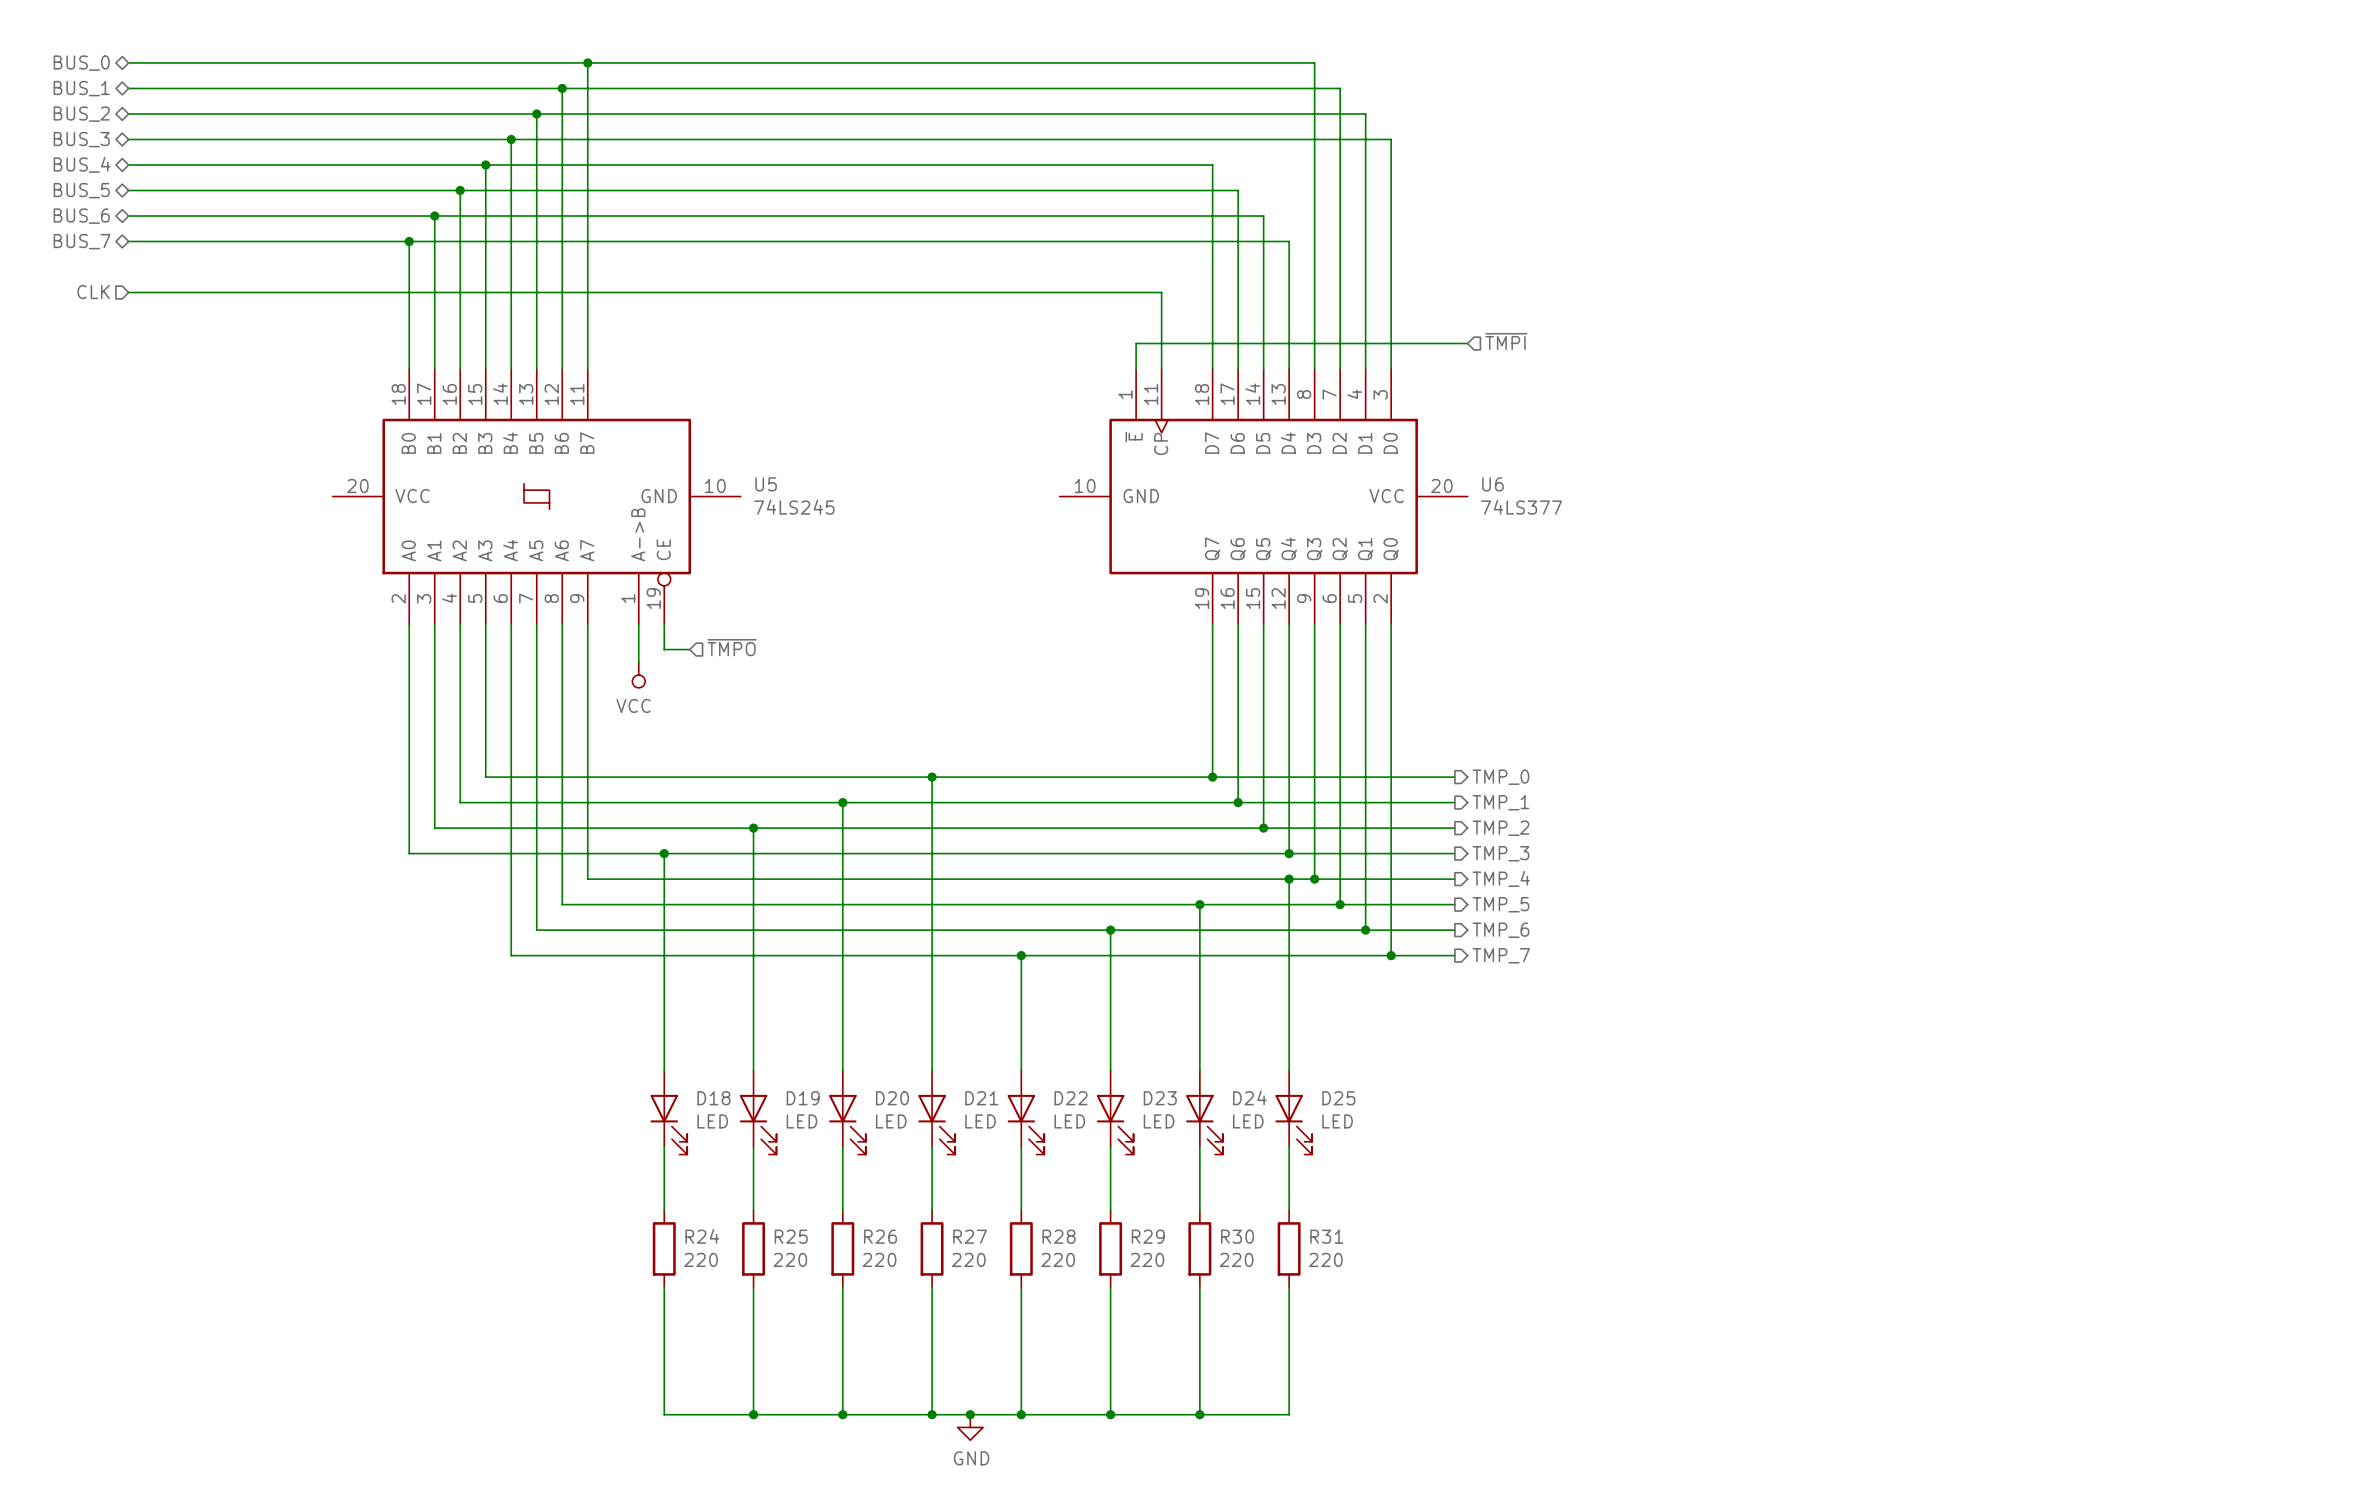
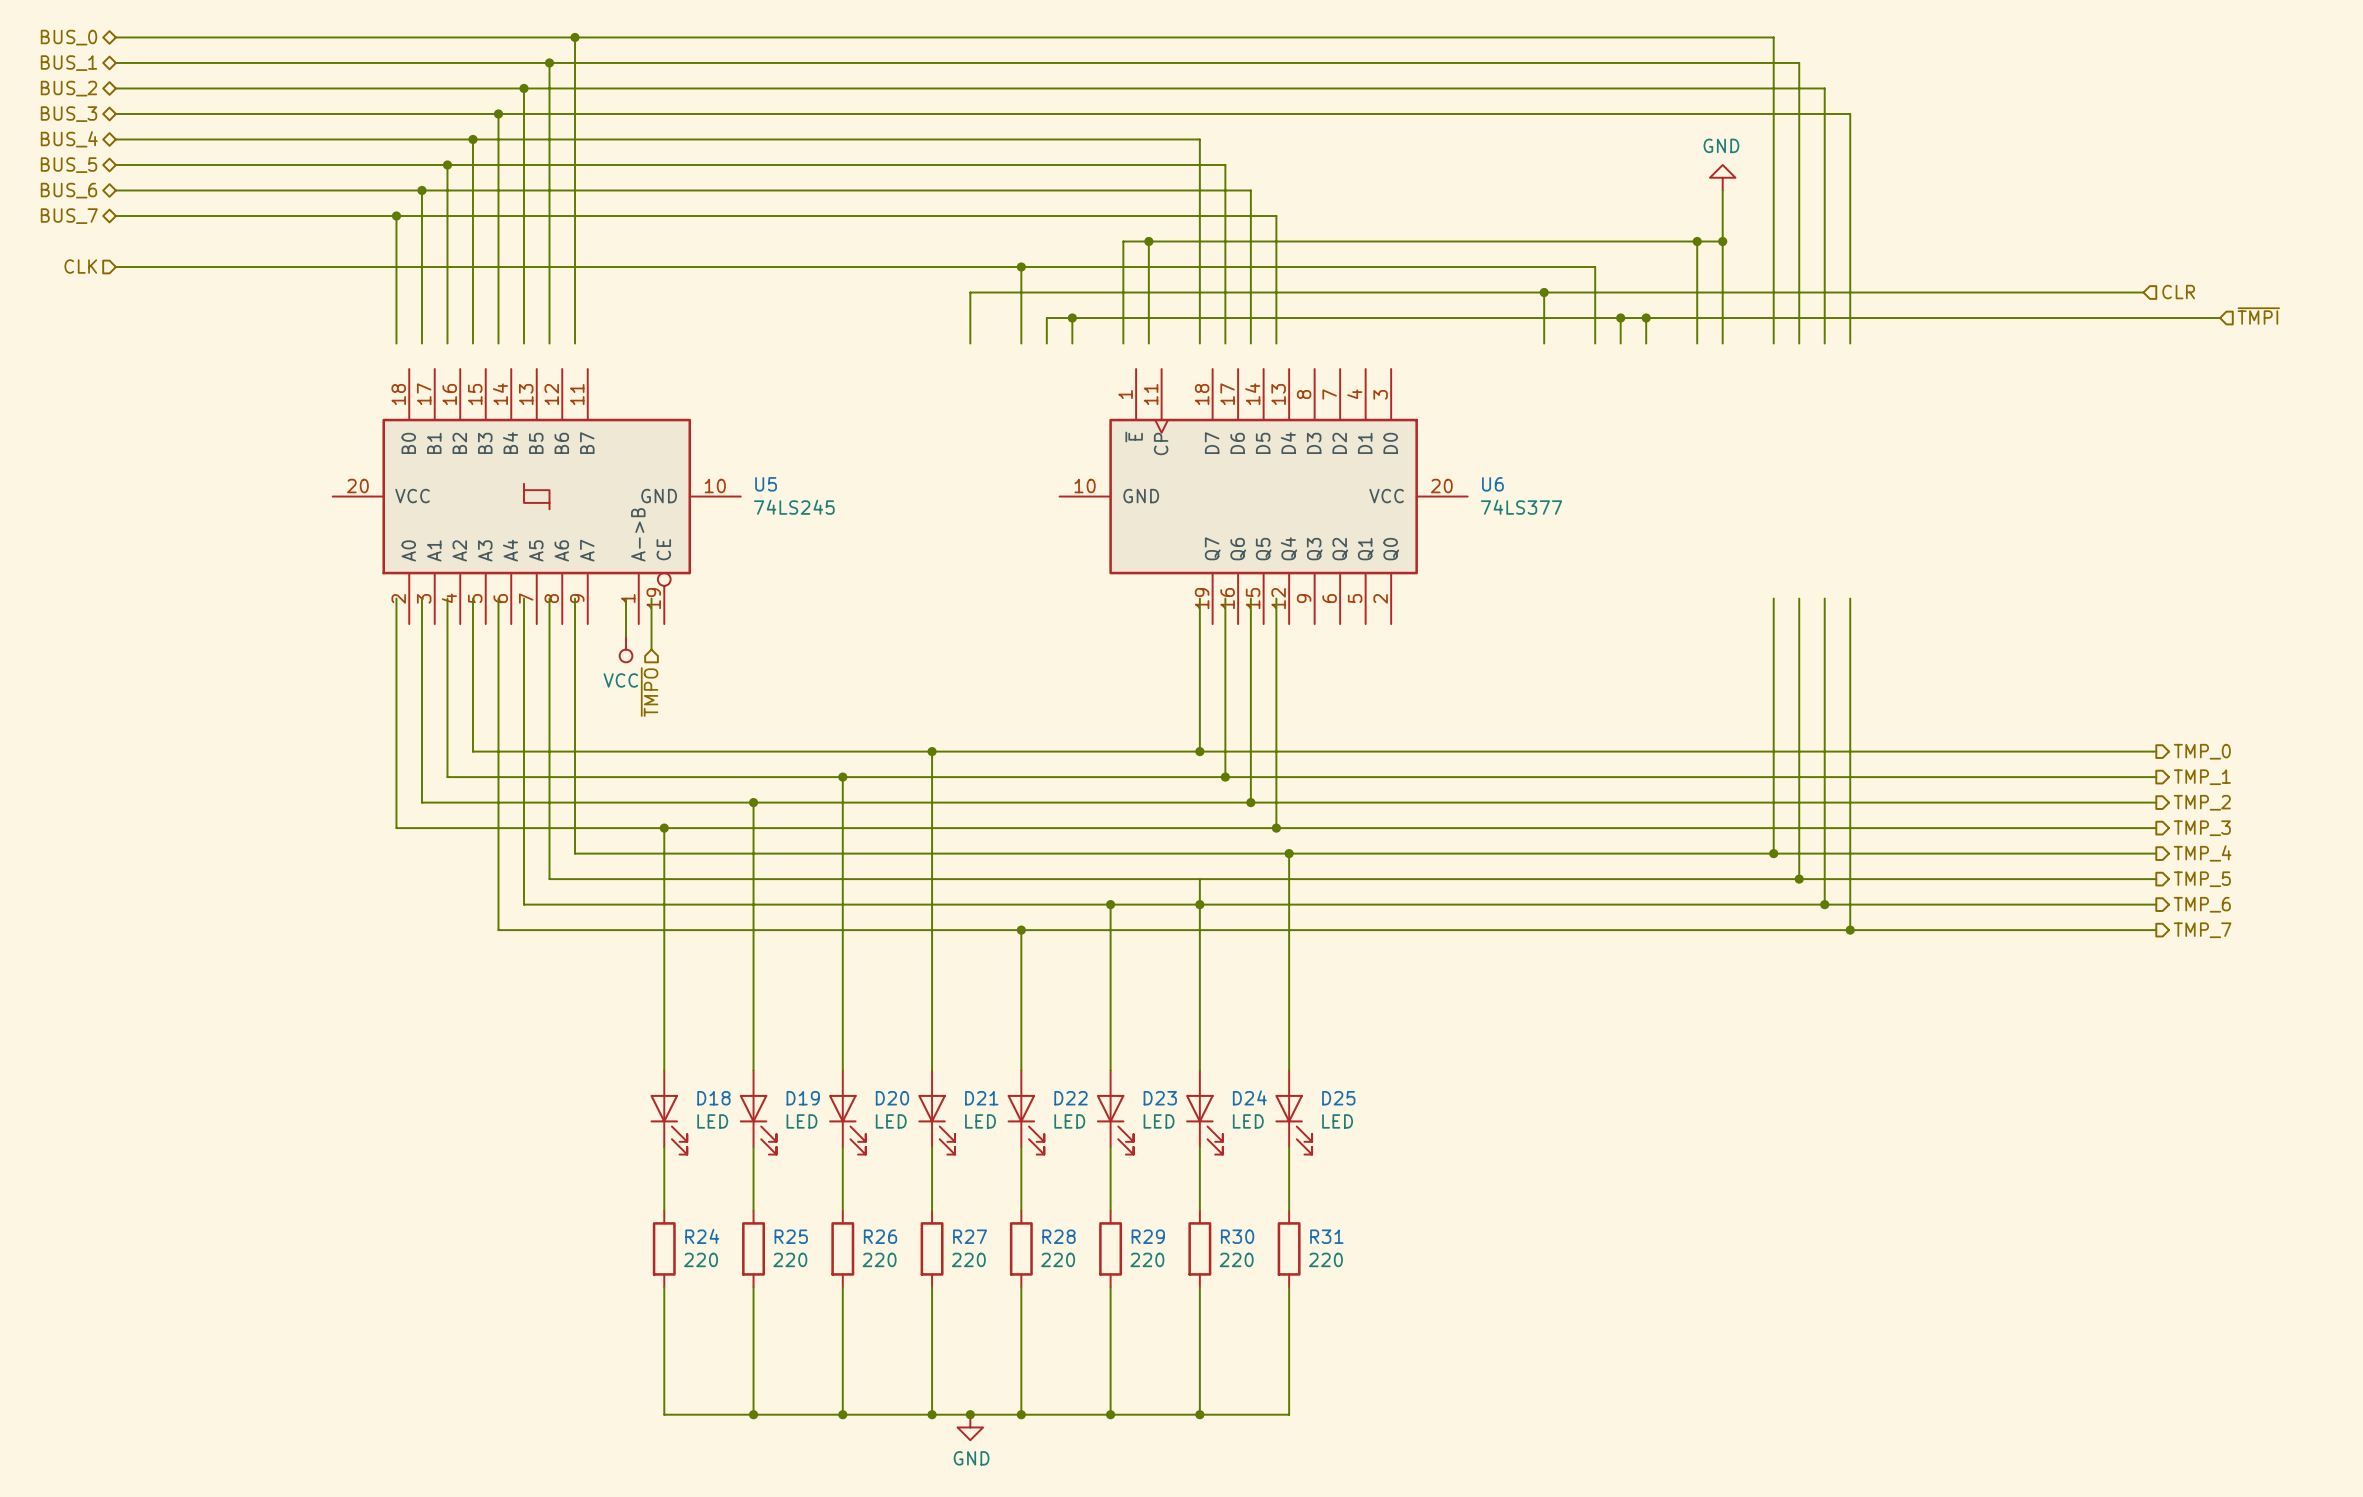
wire: none -> (115, 37) (1773, 37) (1773, 343)
junction: none -> (575, 37)
wire: none -> (115, 62) (128, 62)
junction: none -> (549, 62)
wire: (587, 62) (587, 369) -> (575, 37) (575, 343)
junction: (587, 62) -> none
wire: (1314, 62) (1314, 369) -> (1314, 62) (1799, 62) (1799, 343)
hierarchical label position: BUS_0 (81, 63) -> BUS_0 (68, 37)
hierarchical label position: BUS_1 (81, 88) -> BUS_1 (68, 63)
wire: none -> (115, 88) (128, 88)
junction: none -> (524, 88)
wire: (562, 88) (562, 369) -> (549, 62) (549, 343)
junction: (562, 88) -> none
wire: (1340, 88) (1340, 369) -> (1340, 88) (1824, 88) (1824, 343)
wire: none -> (115, 113) (128, 113)
junction: none -> (498, 113)
wire: (536, 113) (536, 369) -> (524, 88) (524, 343)
junction: (536, 113) -> none
wire: (1365, 113) (1365, 369) -> (1365, 113) (1850, 113) (1850, 343)
hierarchical label position: BUS_2 (81, 114) -> BUS_2 (68, 88)
hierarchical label position: BUS_3 (81, 139) -> BUS_3 (68, 114)
wire: none -> (115, 139) (128, 139)
junction: none -> (472, 139)
wire: (511, 139) (511, 369) -> (498, 113) (498, 343)
junction: (511, 139) -> none
wire: (1199, 139) (1391, 139) (1391, 369) -> (1199, 139) (1199, 343)
hierarchical label position: BUS_4 (82, 164) -> BUS_4 (69, 139)
wire: none -> (115, 164) (128, 164)
junction: none -> (447, 164)
wire: (485, 164) (485, 369) -> (472, 139) (472, 343)
junction: (485, 164) -> none
wire: (1212, 164) (1212, 369) -> (1212, 164) (1225, 164) (1225, 343)
power symbol: none -> GND (1722, 177)
hierarchical label position: BUS_5 (81, 190) -> BUS_5 (68, 165)
wire: none -> (115, 190) (128, 190)
junction: none -> (421, 190)
wire: (460, 190) (460, 369) -> (447, 164) (447, 343)
junction: (460, 190) -> none
wire: (1238, 190) (1238, 369) -> (1238, 190) (1250, 190) (1250, 343)
wire: none -> (1722, 190) (1722, 343)
wire: none -> (115, 215) (128, 215)
junction: none -> (396, 215)
wire: (434, 215) (434, 369) -> (421, 190) (421, 343)
junction: (434, 215) -> none
wire: (1263, 215) (1263, 369) -> (1263, 215) (1276, 215) (1276, 343)
hierarchical label position: BUS_6 (81, 216) -> BUS_6 (68, 190)
hierarchical label position: BUS_7 (82, 241) -> BUS_7 (69, 216)
wire: (128, 241) (1123, 241) -> (1123, 343) (1123, 241)
wire: (409, 241) (409, 369) -> (396, 215) (396, 343)
junction: (409, 241) -> none
wire: none -> (1148, 241) (1148, 343)
junction: none -> (1148, 241)
wire: (1289, 241) (1289, 369) -> (1289, 241) (1722, 241)
wire: none -> (1697, 241) (1697, 343)
junction: none -> (1697, 241)
junction: none -> (1722, 241)
wire: none -> (115, 267) (1595, 267) (1595, 343)
wire: none -> (1021, 267) (1021, 343)
junction: none -> (1021, 267)
hierarchical label position: CLK (93, 292) -> CLK (80, 266)
wire: (128, 292) (970, 292) -> (970, 343) (970, 292)
wire: (1161, 292) (1161, 369) -> (1161, 292) (2143, 292)
wire: none -> (1544, 292) (1544, 343)
junction: none -> (1544, 292)
hierarchical label: none -> CLR (2178, 292)
hierarchical label: none -> ~{TMPI} (2258, 316)
wire: none -> (1072, 318) (1072, 343)
junction: none -> (1072, 318)
wire: none -> (1620, 318) (1620, 343)
junction: none -> (1620, 318)
wire: none -> (1646, 318) (1646, 343)
junction: none -> (1646, 318)
wire: none -> (2220, 318) (1046, 318) (1046, 343)
hierarchical label: ~{TMPI} (1506, 341) -> none
wire: (1467, 343) (1136, 343) (1136, 369) -> none
wire: none -> (472, 598) (472, 751) (2156, 751)
wire: none -> (651, 598) (651, 649)
wire: none -> (1276, 598) (1276, 828)
wire: none -> (1773, 598) (1773, 853)
wire: none -> (1799, 598) (1799, 879)
wire: none -> (1824, 598) (1824, 904)
wire: none -> (1850, 598) (1850, 930)
wire: (409, 624) (409, 853) (575, 853) -> (575, 598) (575, 853)
wire: (434, 624) (434, 828) -> (396, 598) (396, 828) (434, 828)
wire: (460, 624) (460, 802) -> (421, 598) (421, 802) (460, 802)
wire: (485, 624) (485, 777) -> (447, 598) (447, 777) (485, 777)
wire: (511, 624) (511, 955) (1454, 955) -> none
wire: (536, 624) (536, 930) -> (498, 598) (498, 930) (536, 930)
wire: (562, 624) (562, 904) -> (524, 598) (524, 904) (562, 904)
wire: (587, 624) (587, 879) -> (549, 598) (549, 879) (587, 879)
wire: (638, 624) (638, 662) -> (626, 598) (626, 636)
wire: (664, 624) (664, 649) (689, 649) -> none
wire: (1212, 624) (1212, 777) -> (1199, 598) (1199, 751)
wire: (1238, 624) (1238, 802) -> (1225, 598) (1225, 777)
wire: (1263, 624) (1263, 828) -> (1250, 598) (1250, 802)
wire: (1289, 624) (1289, 853) -> (1289, 879) (1289, 853)
wire: (1314, 624) (1314, 879) -> none
wire: (1340, 624) (1340, 904) -> none
wire: (1365, 624) (1365, 930) -> none
wire: (1391, 624) (1391, 955) -> none
hierarchical label rotation: 0° (732, 647) -> 90° clockwise (649, 692)
hierarchical label position: ~{TMPO} (732, 647) -> ~{TMPO} (649, 692)
power symbol position: VCC (638, 675) -> VCC (626, 649)
wire: none -> (932, 751) (932, 777)
junction: none -> (1199, 751)
hierarchical label: none -> TMP_0 (2202, 751)
wire: none -> (842, 777) (842, 802)
junction position: (932, 777) -> (932, 751)
junction position: (1212, 777) -> (1225, 777)
wire: none -> (1454, 777) (2156, 777)
hierarchical label: TMP_0 (1500, 777) -> none
hierarchical label: none -> TMP_1 (2202, 777)
wire: none -> (753, 802) (753, 828)
junction position: (842, 802) -> (842, 777)
junction position: (1238, 802) -> (1250, 802)
wire: none -> (1454, 802) (2156, 802)
hierarchical label: TMP_1 (1500, 802) -> none
hierarchical label: none -> TMP_2 (2202, 802)
wire: none -> (664, 828) (664, 853)
junction position: (753, 828) -> (753, 802)
junction position: (1263, 828) -> (1276, 828)
wire: none -> (1454, 828) (2156, 828)
hierarchical label: TMP_2 (1500, 828) -> none
hierarchical label: none -> TMP_3 (2202, 828)
junction position: (664, 853) -> (664, 828)
wire: none -> (1454, 853) (2156, 853)
hierarchical label: TMP_3 (1500, 853) -> none
junction: none -> (1773, 853)
hierarchical label: none -> TMP_4 (2202, 853)
hierarchical label: TMP_4 (1501, 878) -> none
wire: none -> (1199, 879) (1199, 904)
junction: (1289, 879) -> none
junction: (1314, 879) -> none
wire: none -> (1454, 879) (2156, 879)
junction: none -> (1799, 879)
hierarchical label: none -> TMP_5 (2202, 879)
wire: none -> (1110, 904) (1110, 930)
junction: (1340, 904) -> none
wire: none -> (1454, 904) (2156, 904)
hierarchical label: TMP_5 (1500, 904) -> none
junction: none -> (1824, 904)
hierarchical label: none -> TMP_6 (2202, 904)
wire: none -> (1021, 930) (1021, 955)
junction position: (1110, 930) -> (1110, 904)
junction: (1365, 930) -> none
wire: none -> (1454, 930) (2156, 930)
hierarchical label: TMP_6 (1500, 930) -> none
junction: none -> (1850, 930)
hierarchical label: none -> TMP_7 (2202, 930)
junction position: (1021, 955) -> (1021, 930)
junction: (1391, 955) -> none
hierarchical label: TMP_7 (1501, 955) -> none

